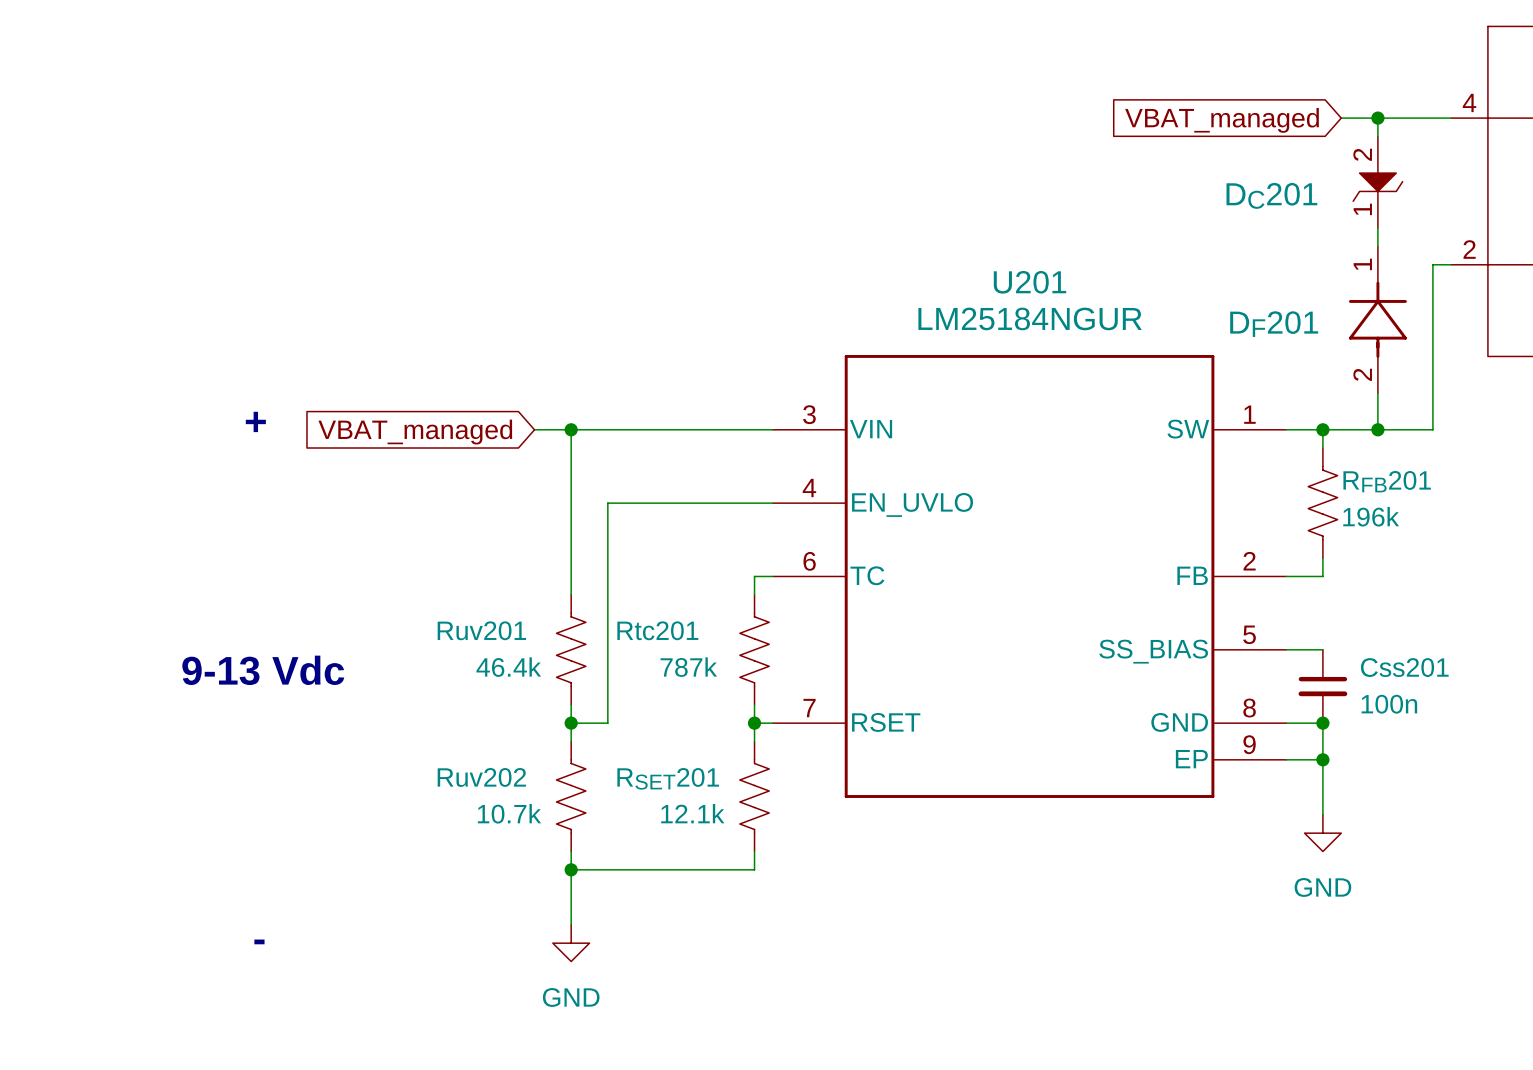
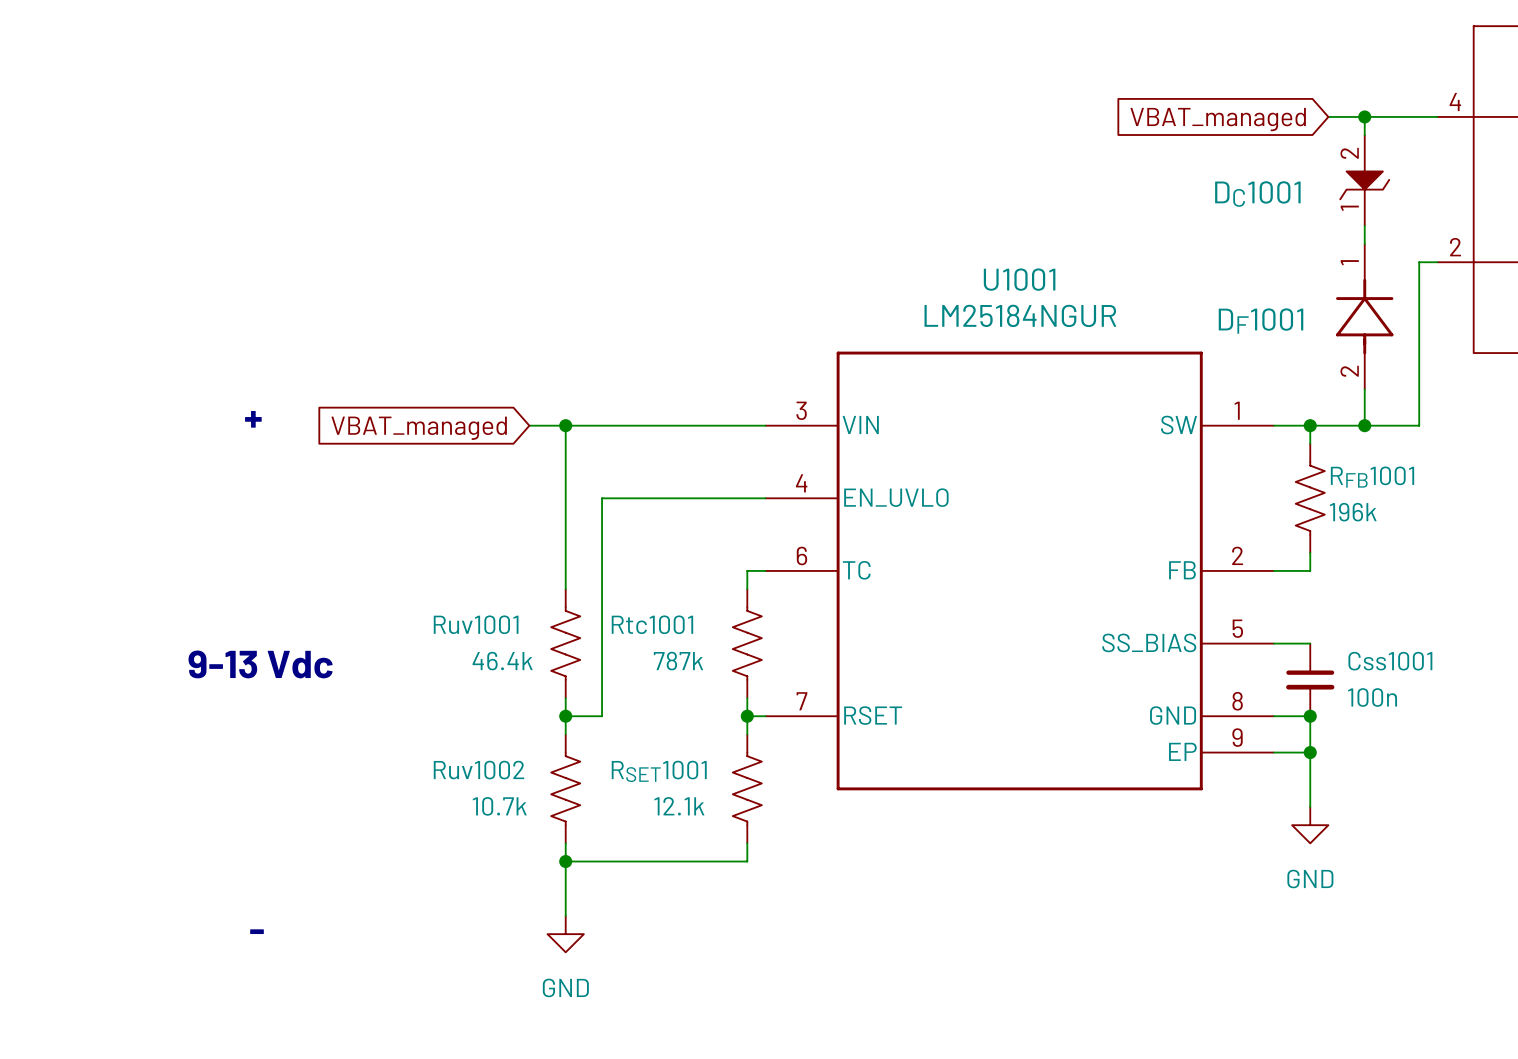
DC201 name: DC201 (1271, 195) -> DC1001 (1257, 194)
U201 name: U201 (1030, 282) -> U1001 (1019, 279)
DF201 name: DF201 (1274, 324) -> DF1001 (1261, 321)
RFB201 name: RFB201 (1387, 481) -> RFB1001 (1372, 477)
Ruv201 name: Ruv201 (481, 630) -> Ruv1001 (476, 624)
Rtc201 name: Rtc201 (657, 630) -> Rtc1001 (652, 624)
Css201 name: Css201 (1404, 667) -> Css1001 (1390, 661)
Ruv202 name: Ruv202 (481, 777) -> Ruv1002 (479, 770)
RSET201 name: RSET201 (668, 778) -> RSET1001 (659, 771)

